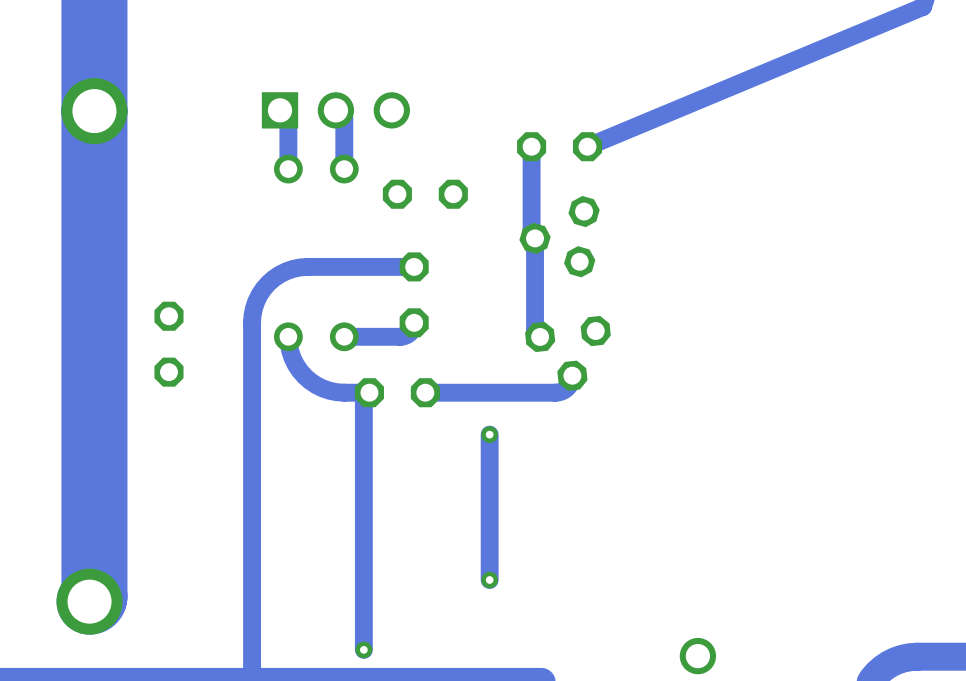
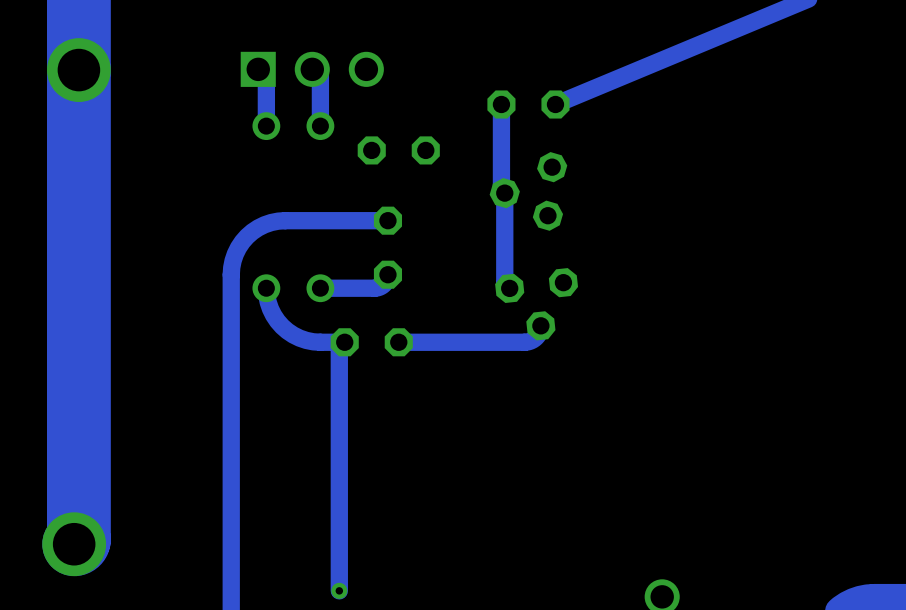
part: (168, 344) -> none
track: (489, 434) (489, 580) -> none
via: (489, 434) -> none
via: (489, 580) -> none

